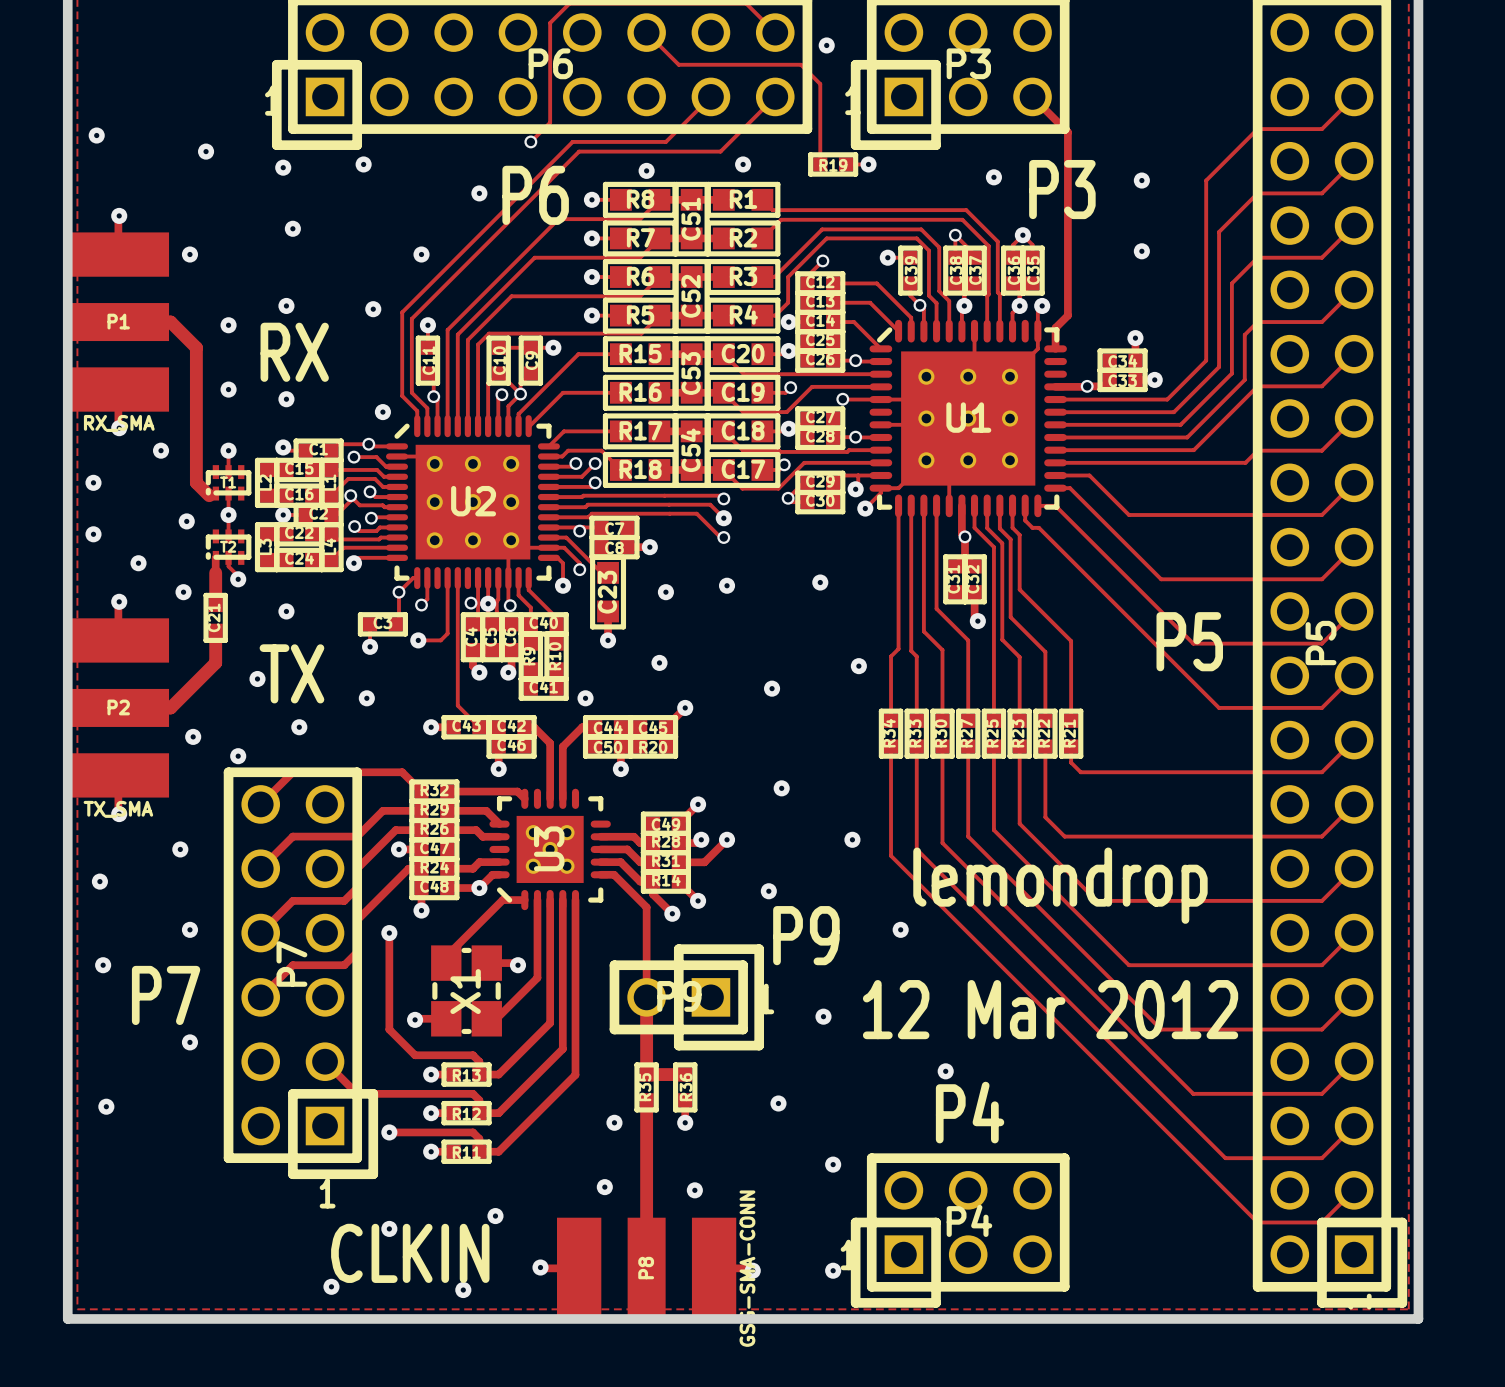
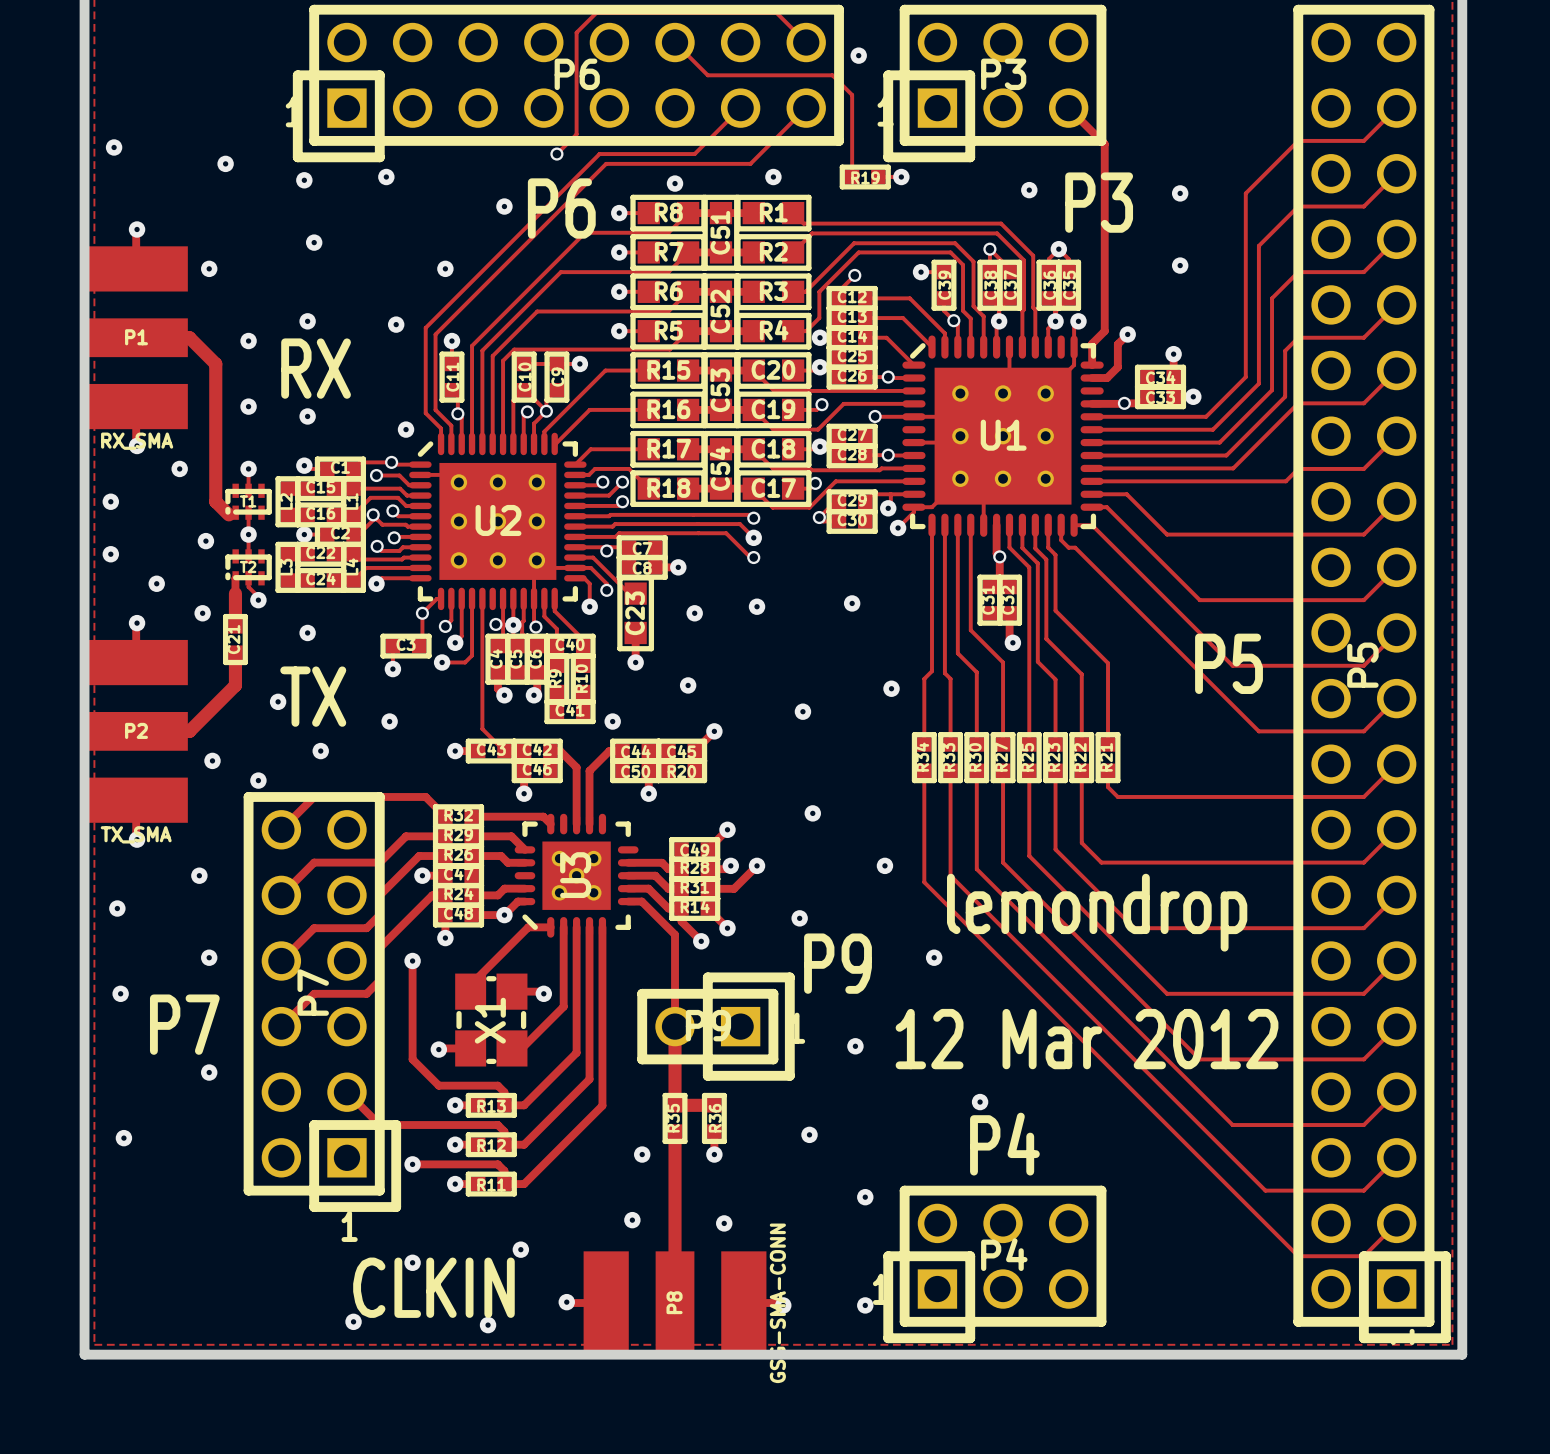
track: none -> (1127, 334) (1117, 344) (1117, 367) (1107, 378) (1092, 378)
via: none -> (1127, 334)
track: none -> (461, 598) (461, 636) (455, 642)
via: none -> (455, 642)

